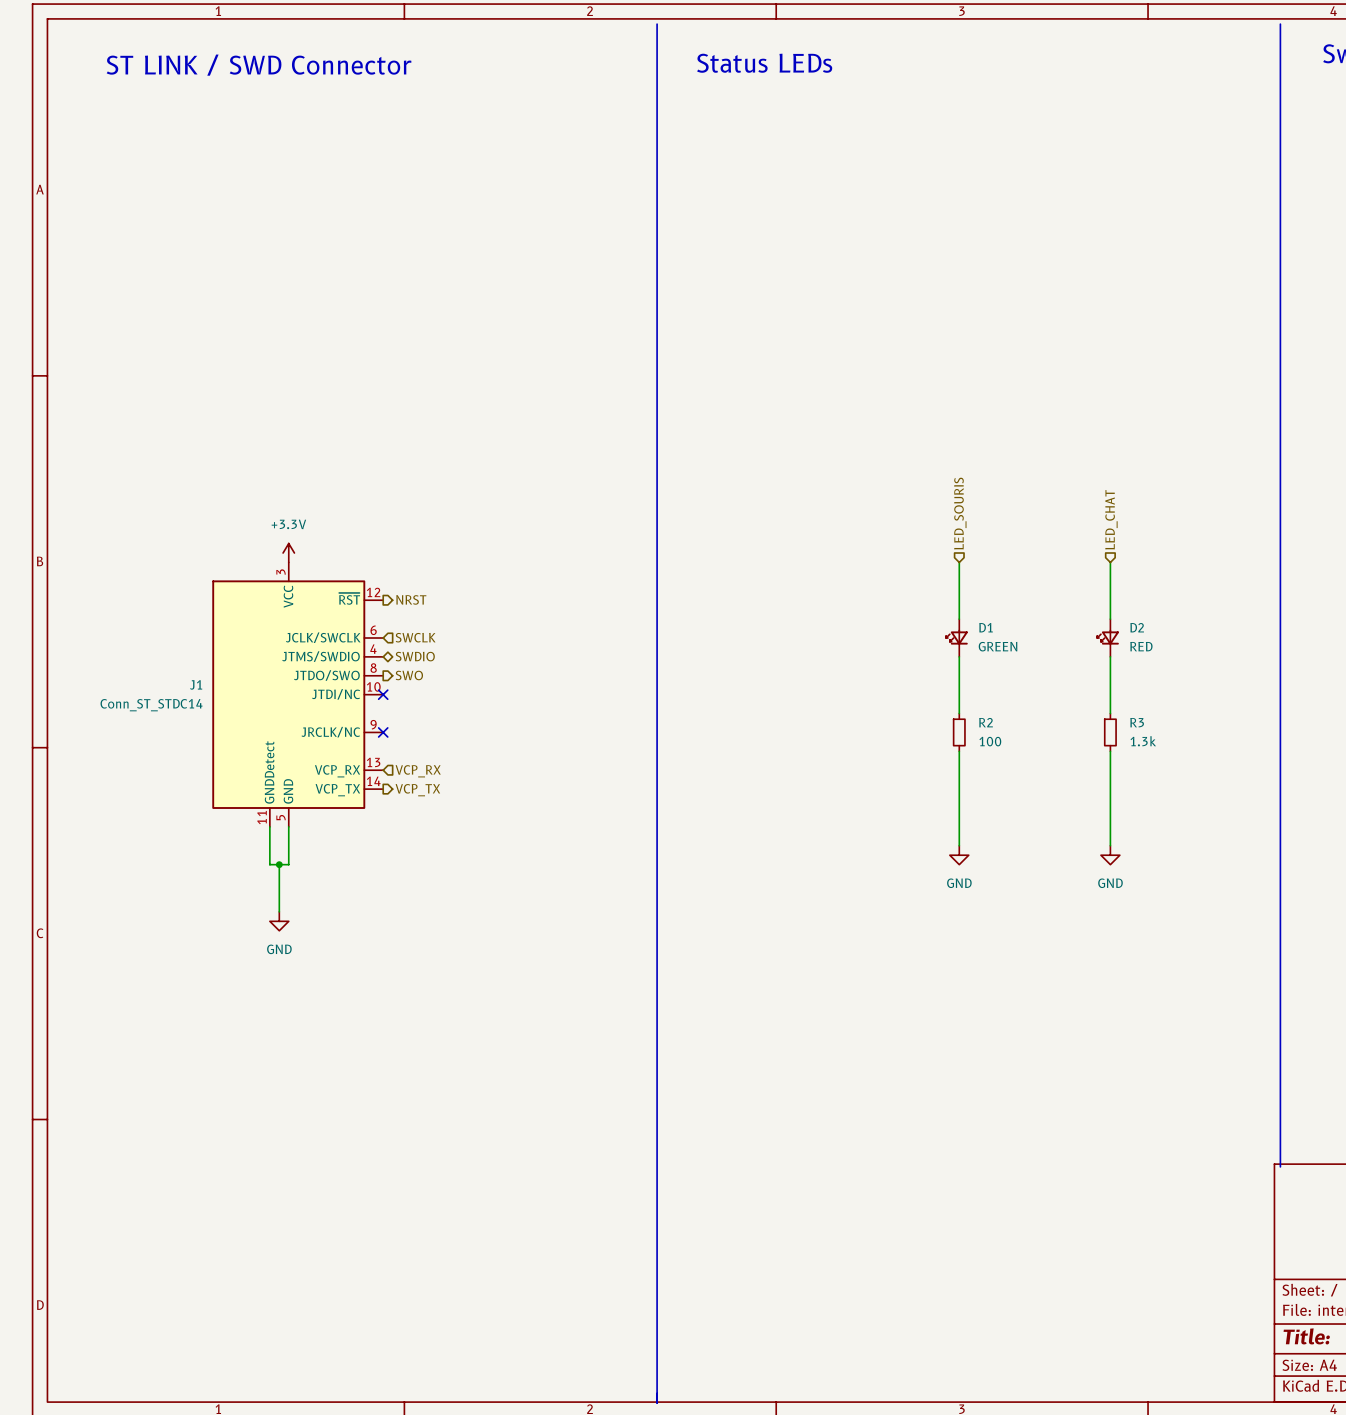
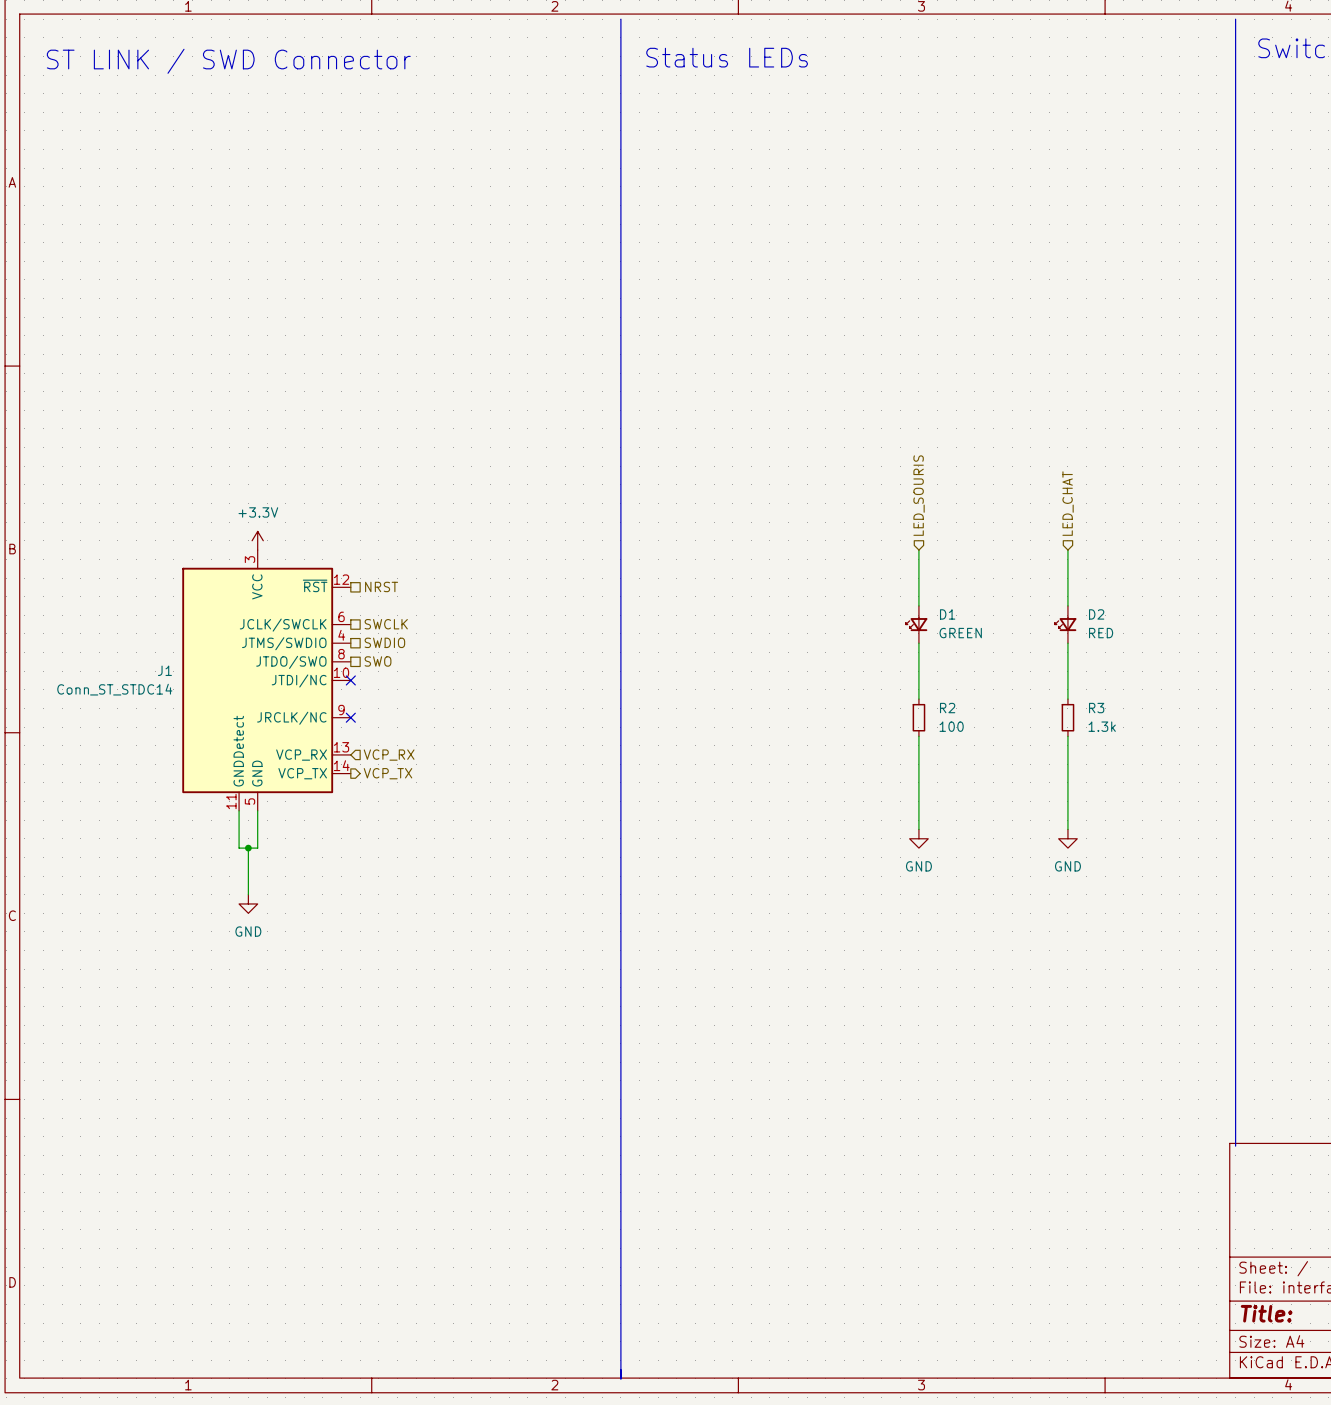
hierarchical label shape: output (411, 599) -> passive (381, 586)
hierarchical label shape: input (415, 637) -> passive (386, 624)
hierarchical label shape: bidirectional (415, 656) -> passive (384, 642)
hierarchical label shape: output (409, 675) -> passive (378, 661)

